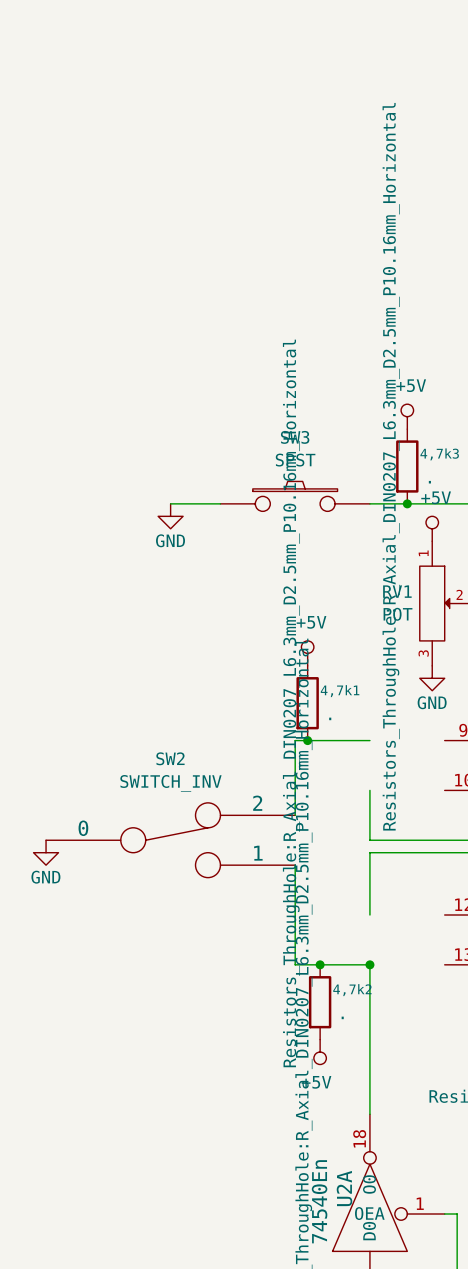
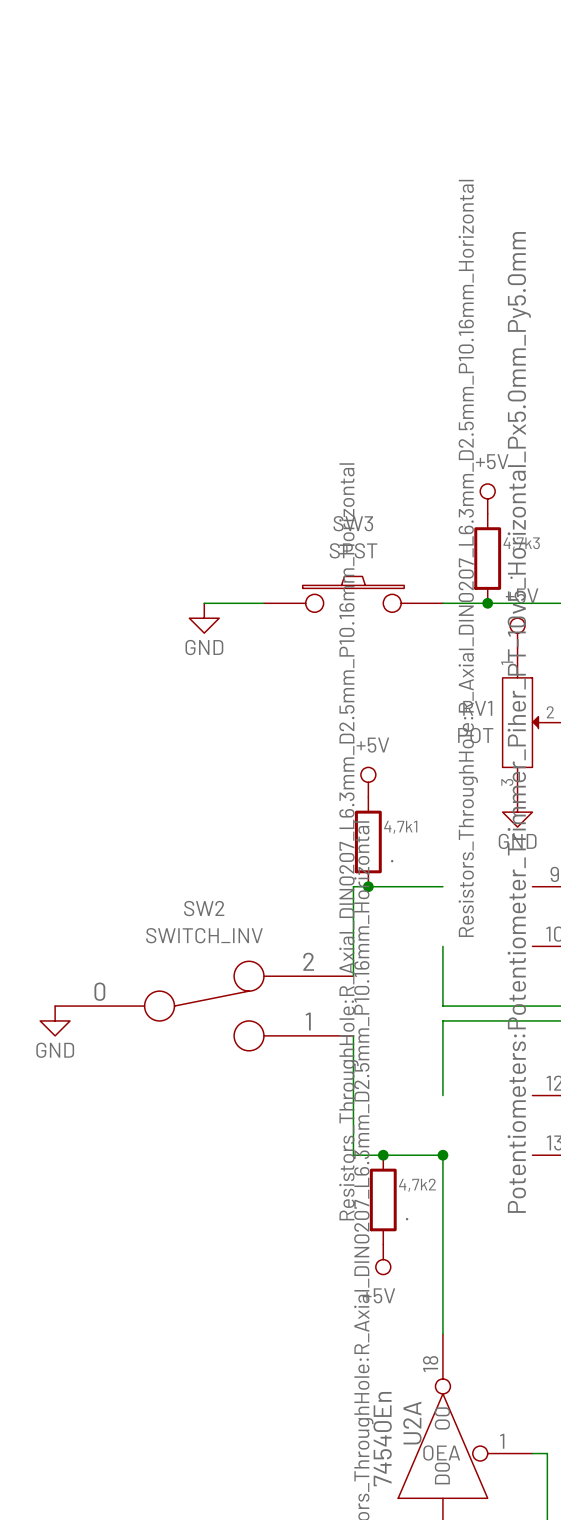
RV1 text: none -> Potentiometers:Potentiometer_Trimmer_Piher_PT-10v5_Horizontal_Px5.0mm_Py5.0mm (519, 722)

